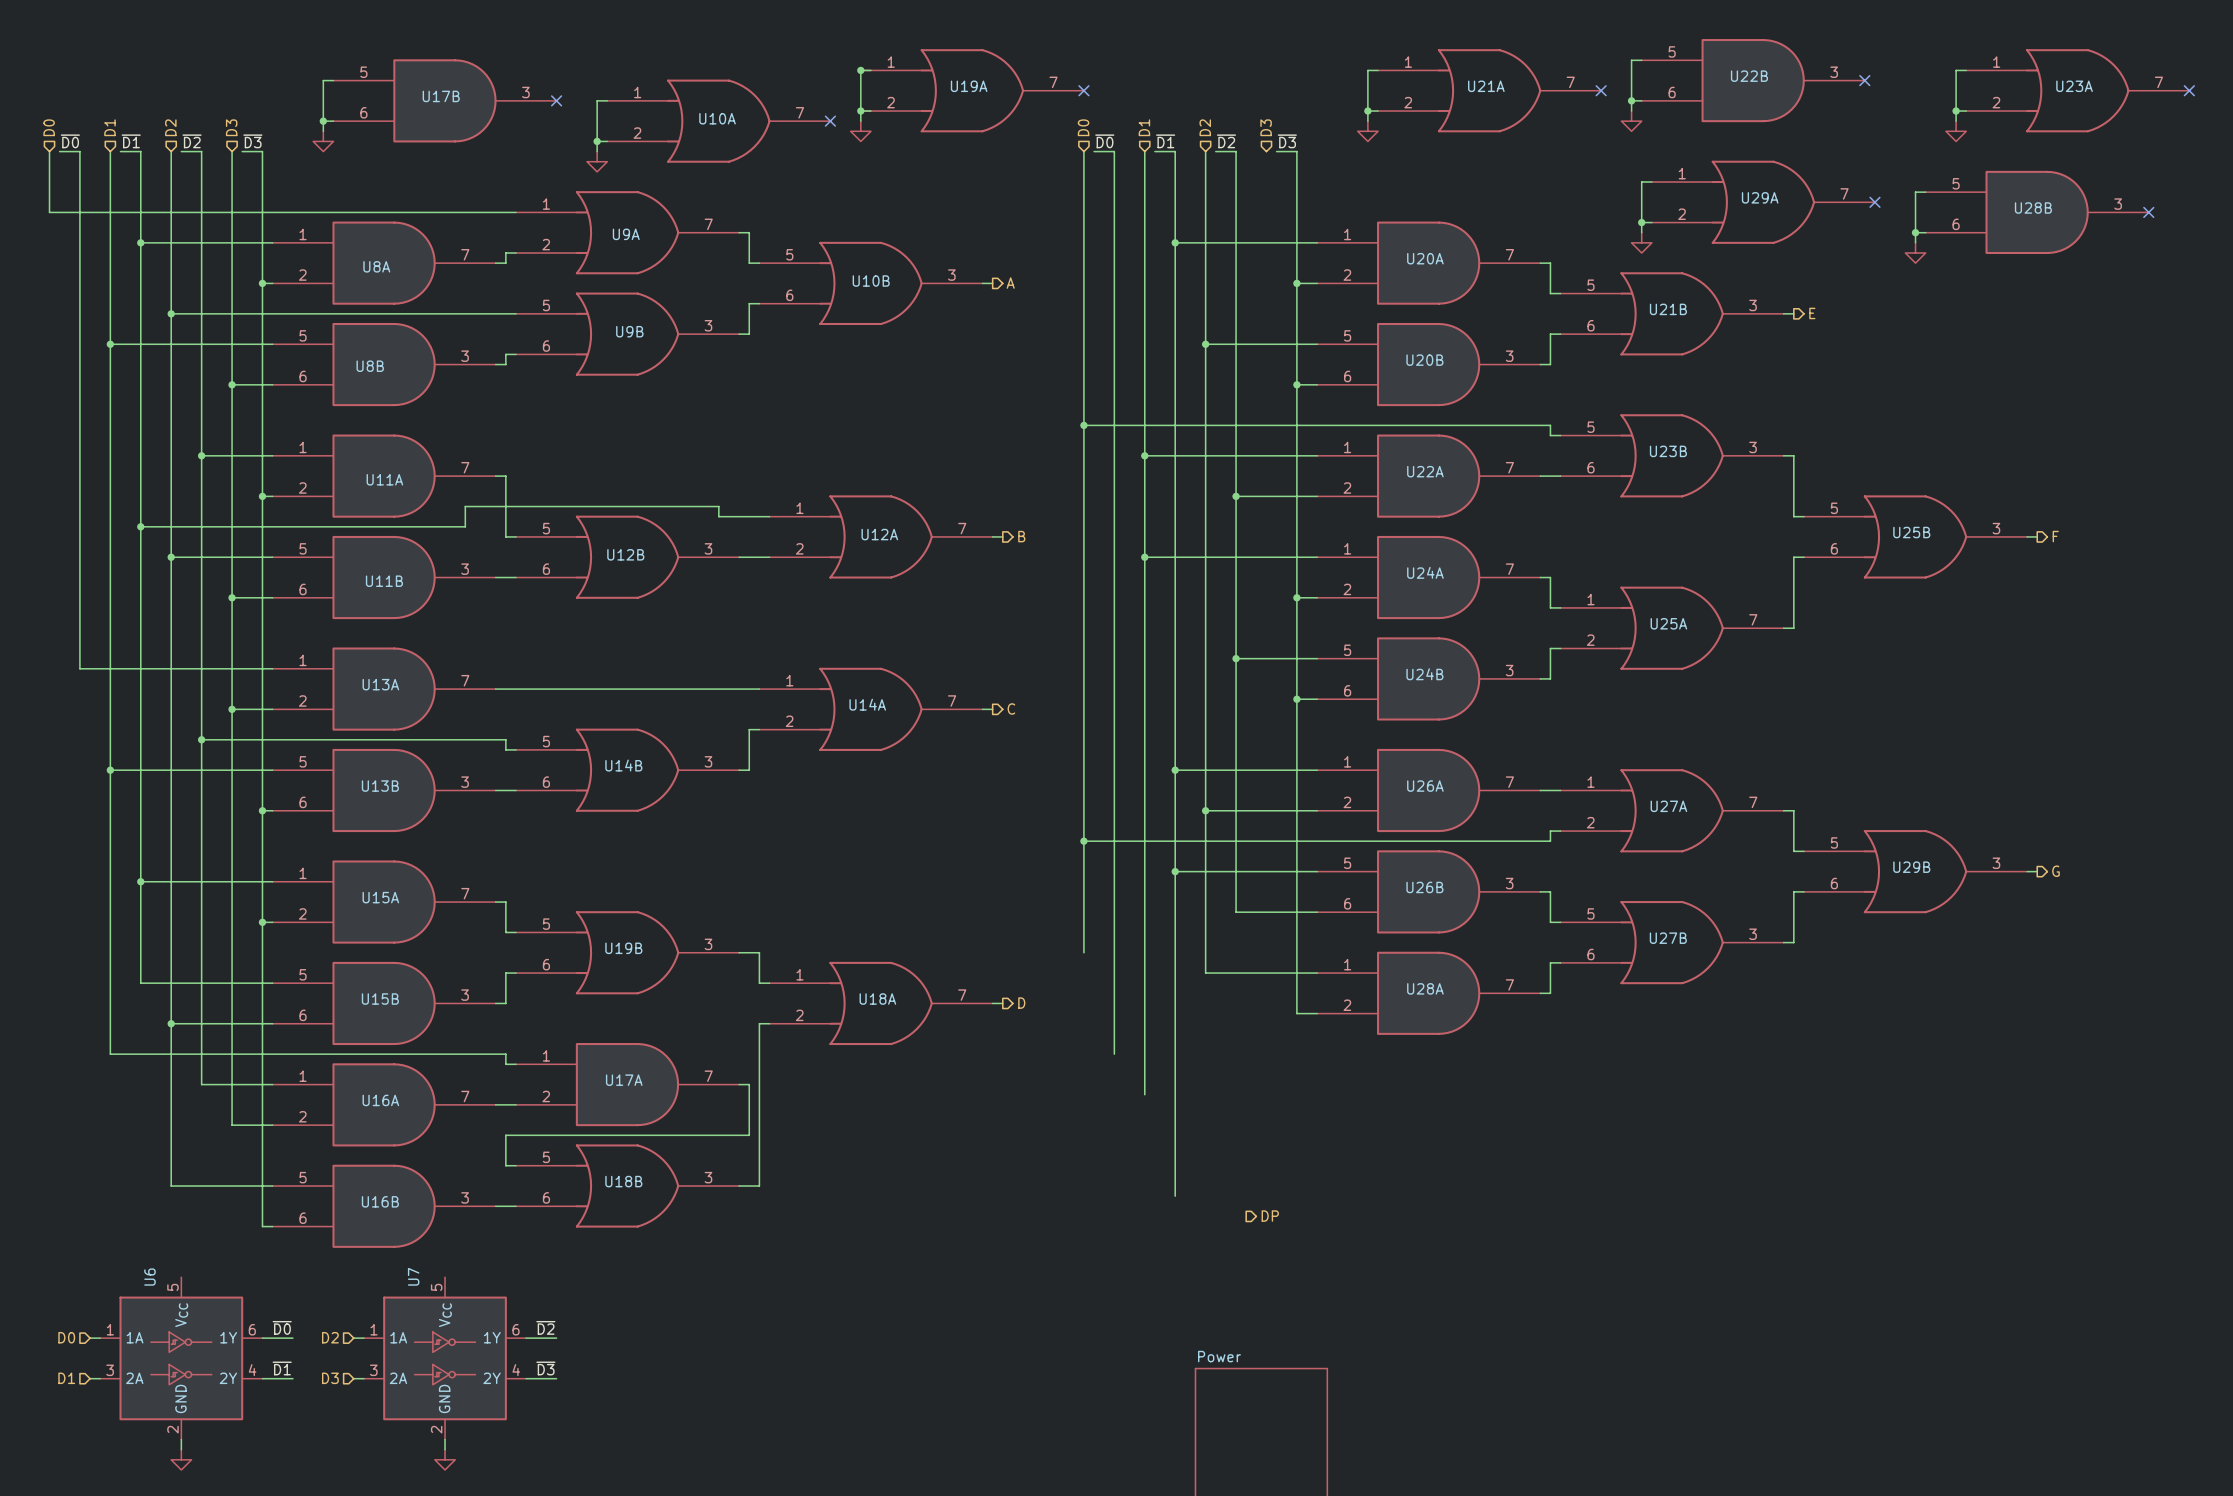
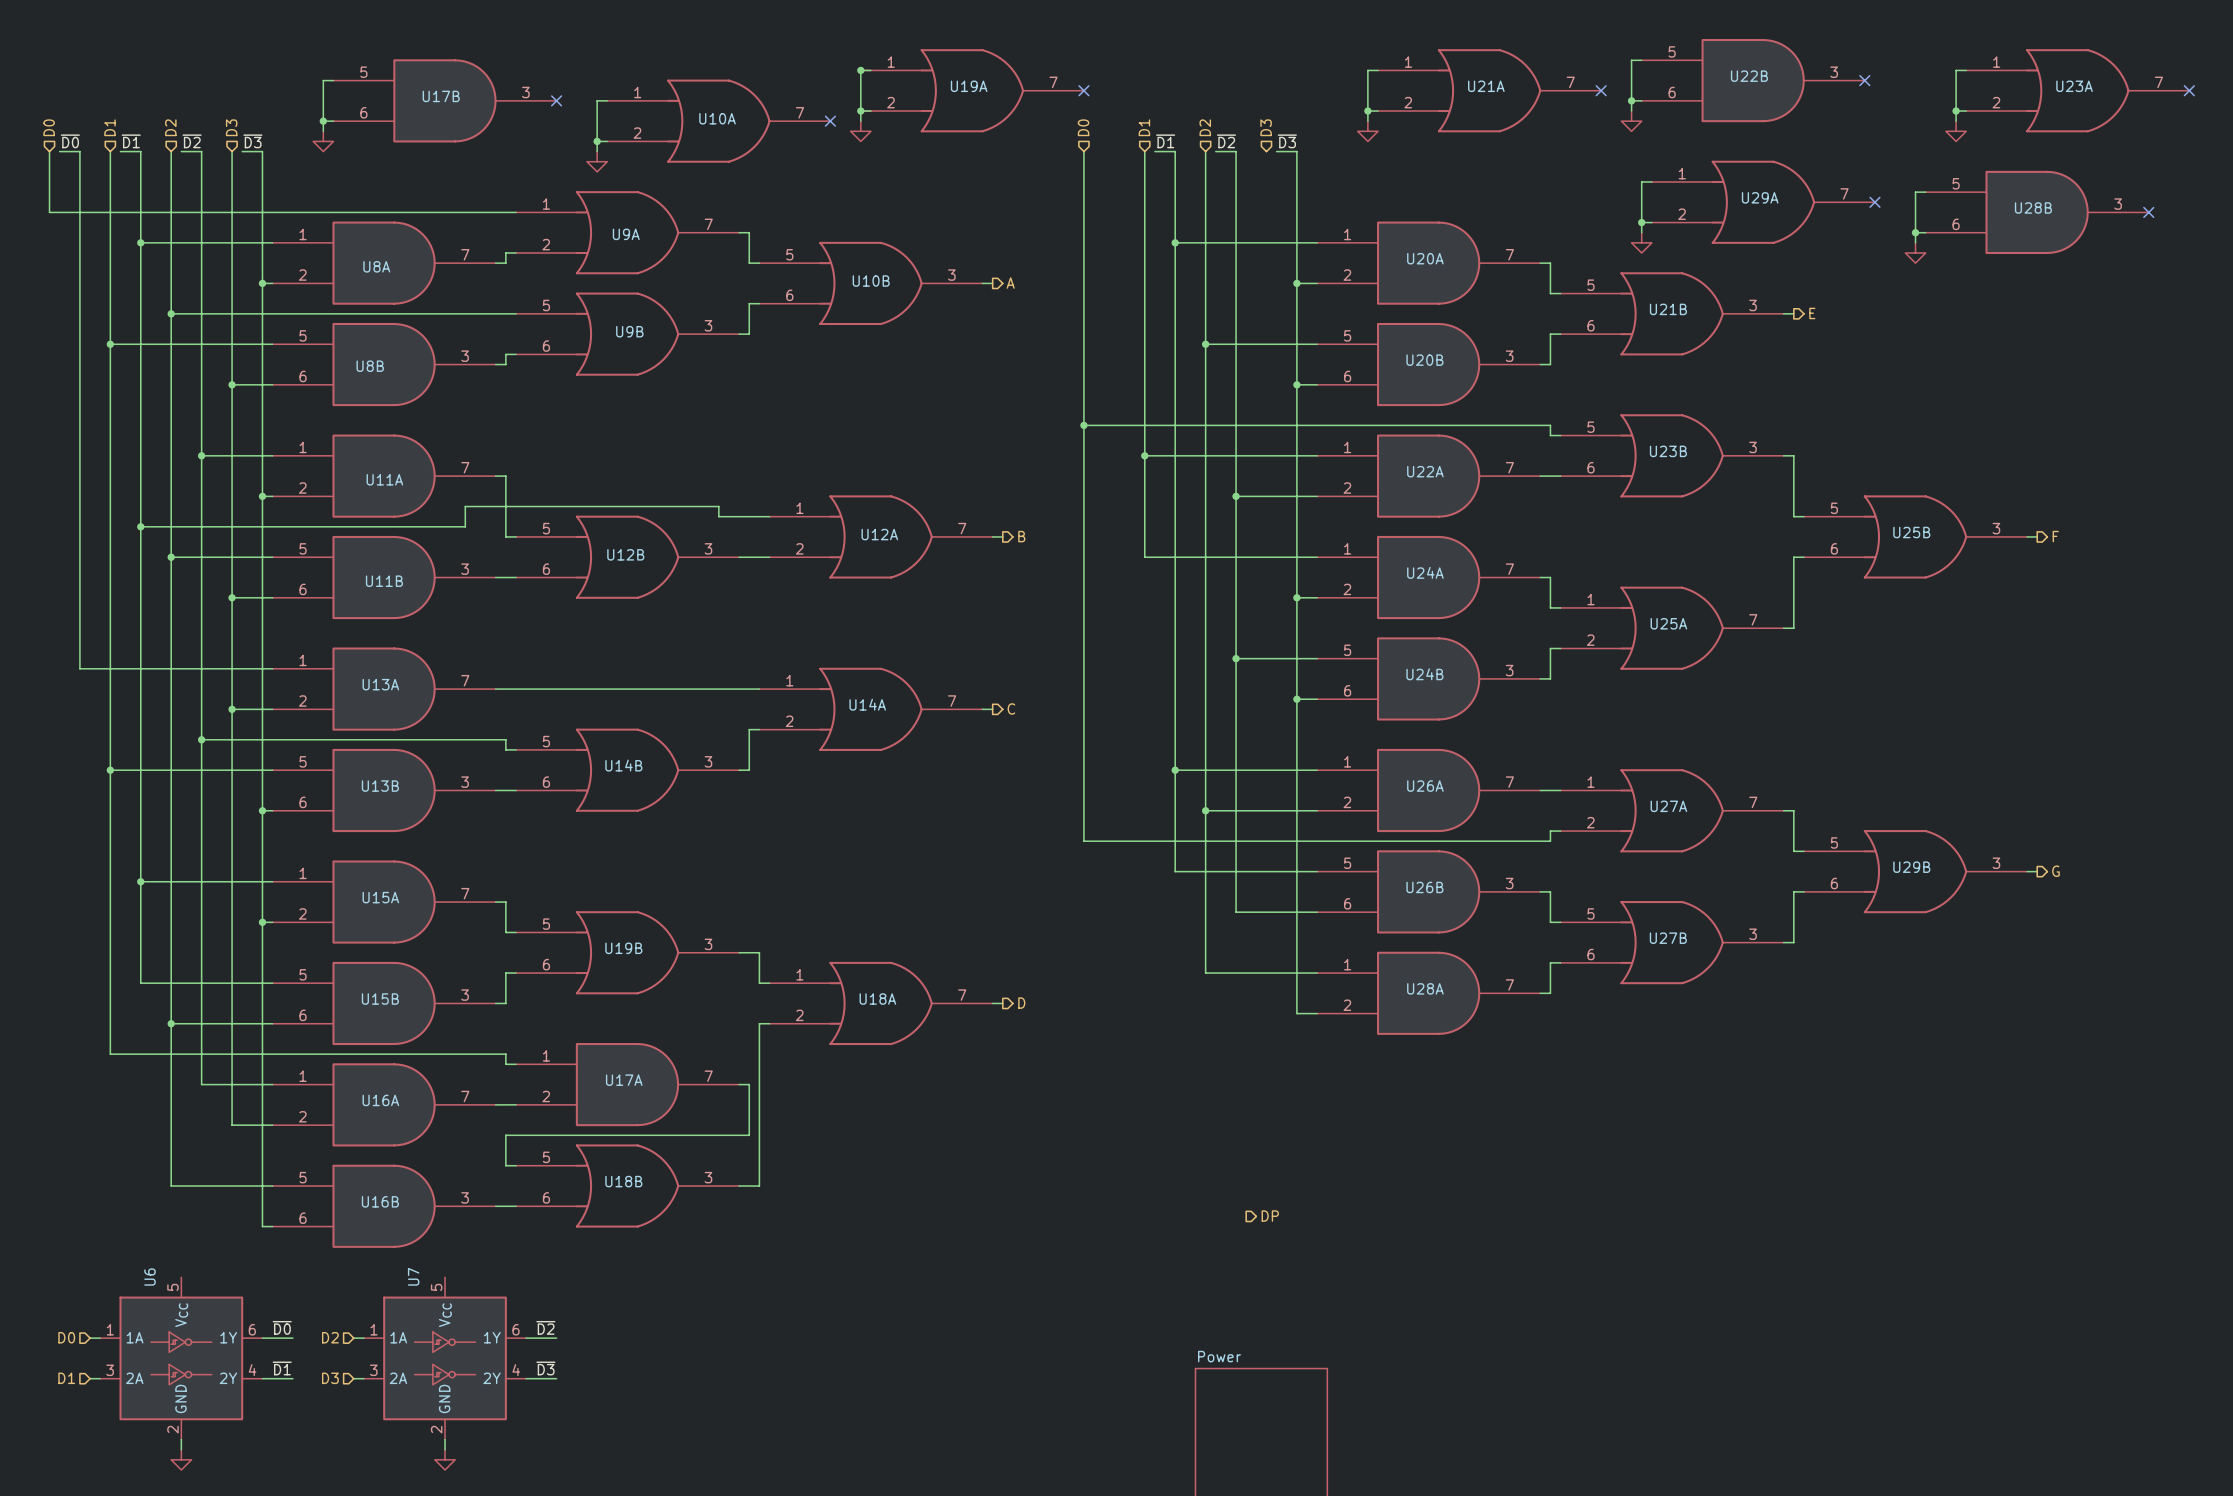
label: ~{D0} (1104, 141) -> none
wire: (1094, 151) (1114, 151) (1114, 1054) -> none
wire: (1144, 557) (1144, 1094) -> none
junction: (1144, 557) -> none
wire: (1083, 841) (1083, 952) -> none
junction: (1083, 841) -> none
wire: (1175, 871) (1175, 1196) -> none
junction: (1175, 871) -> none

